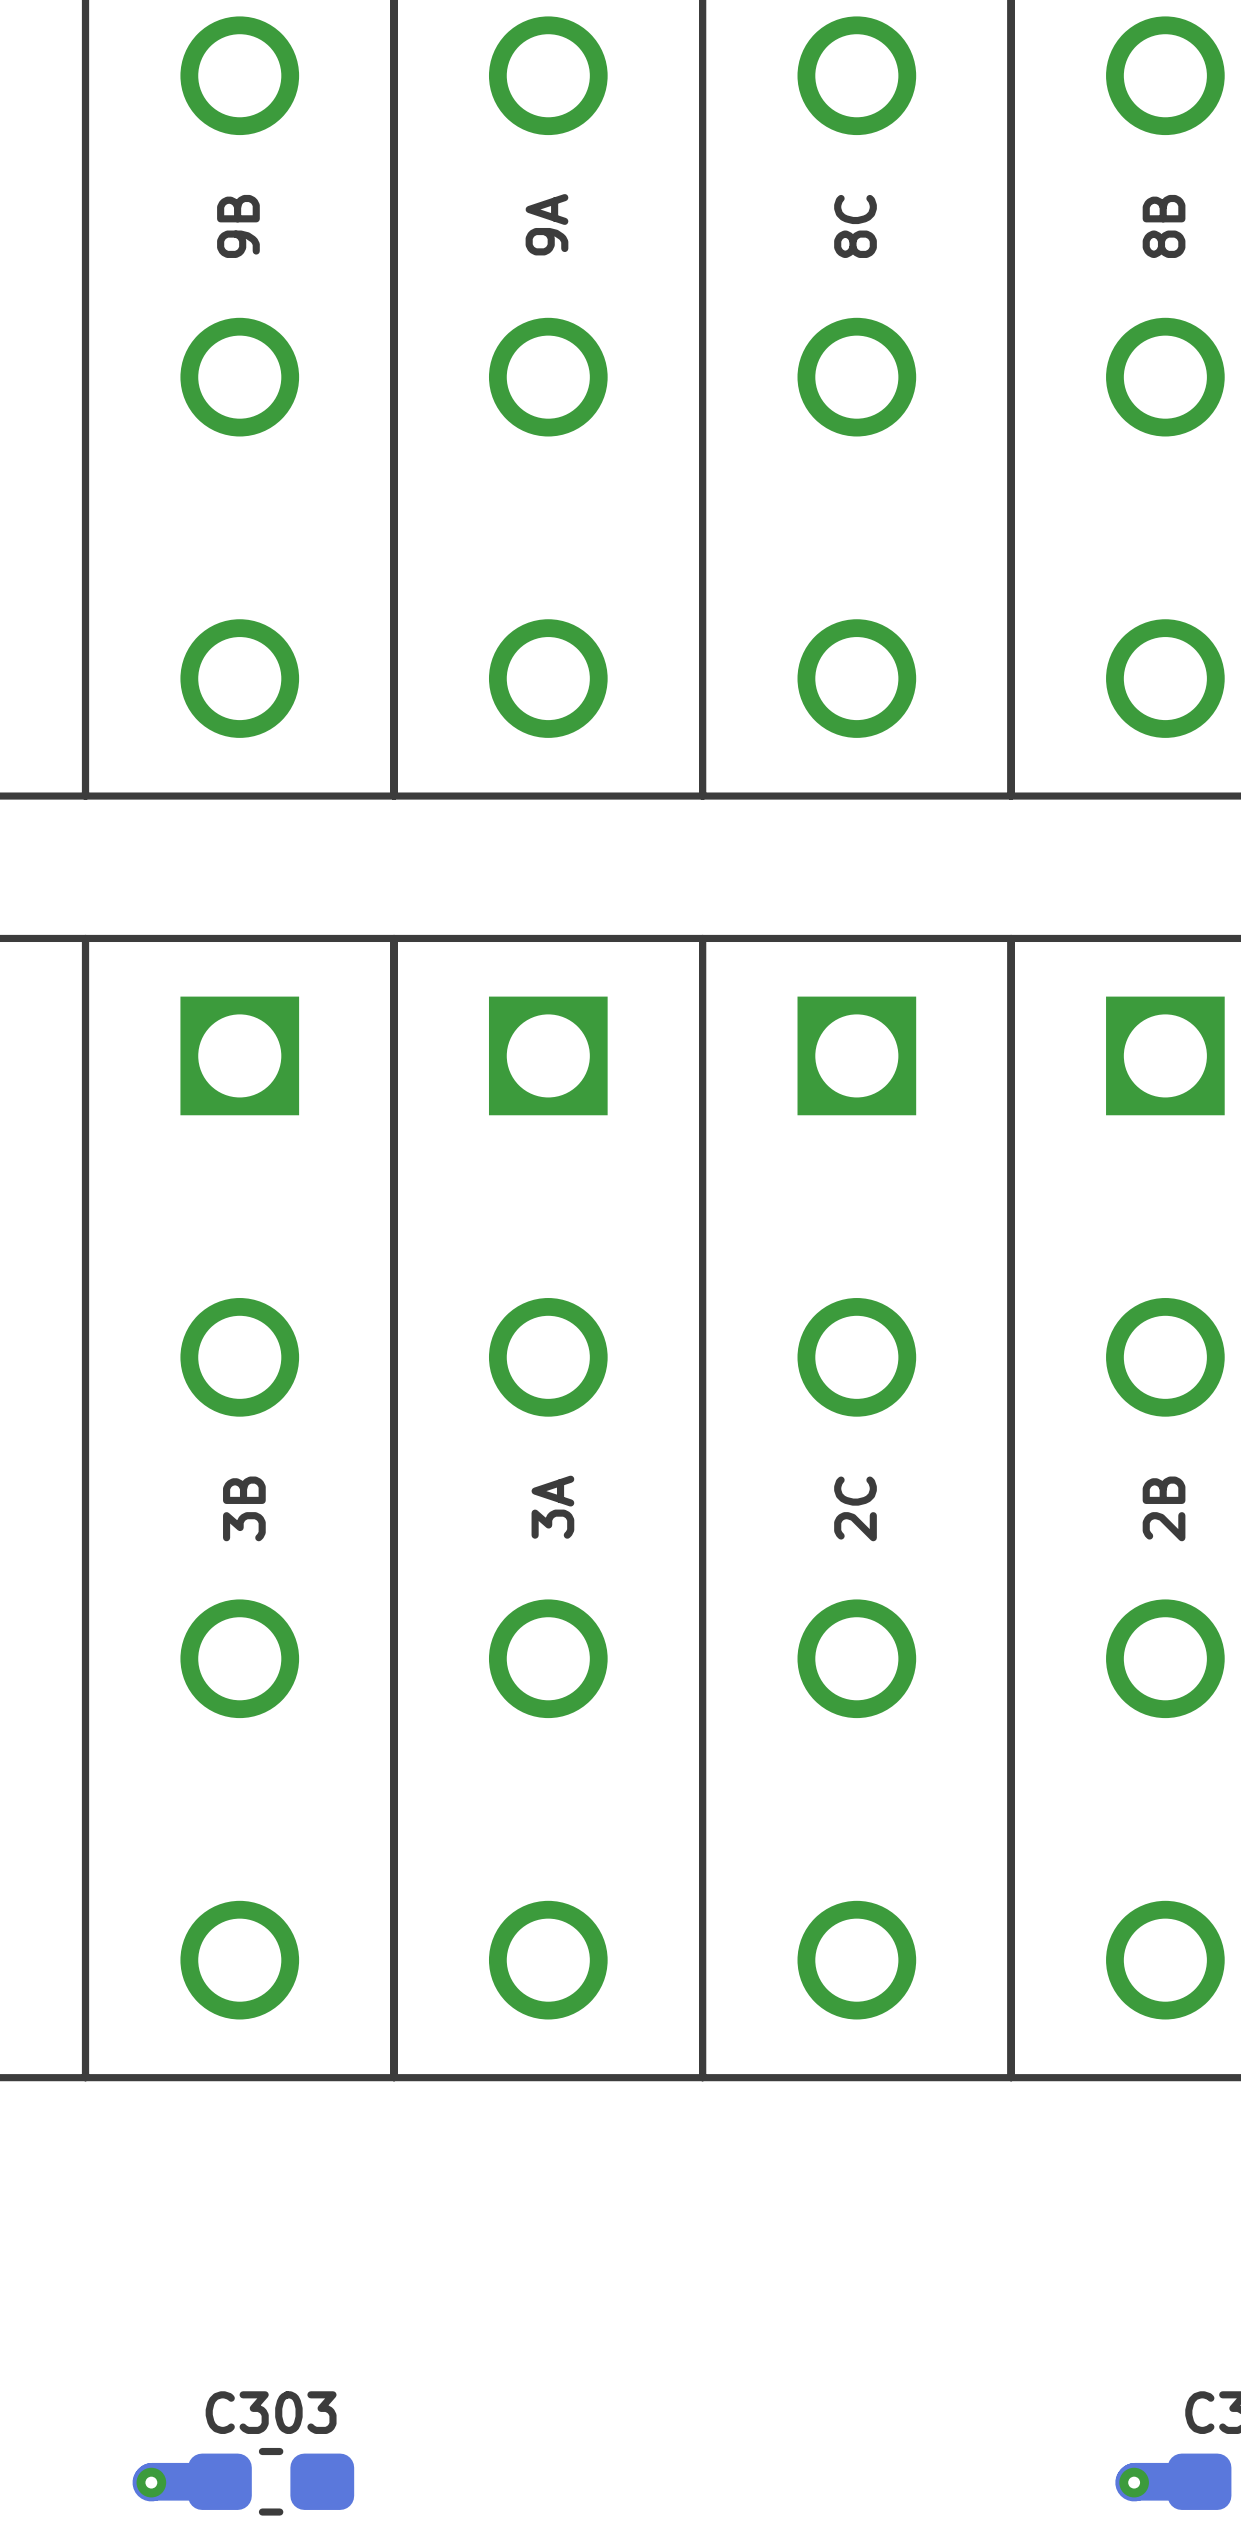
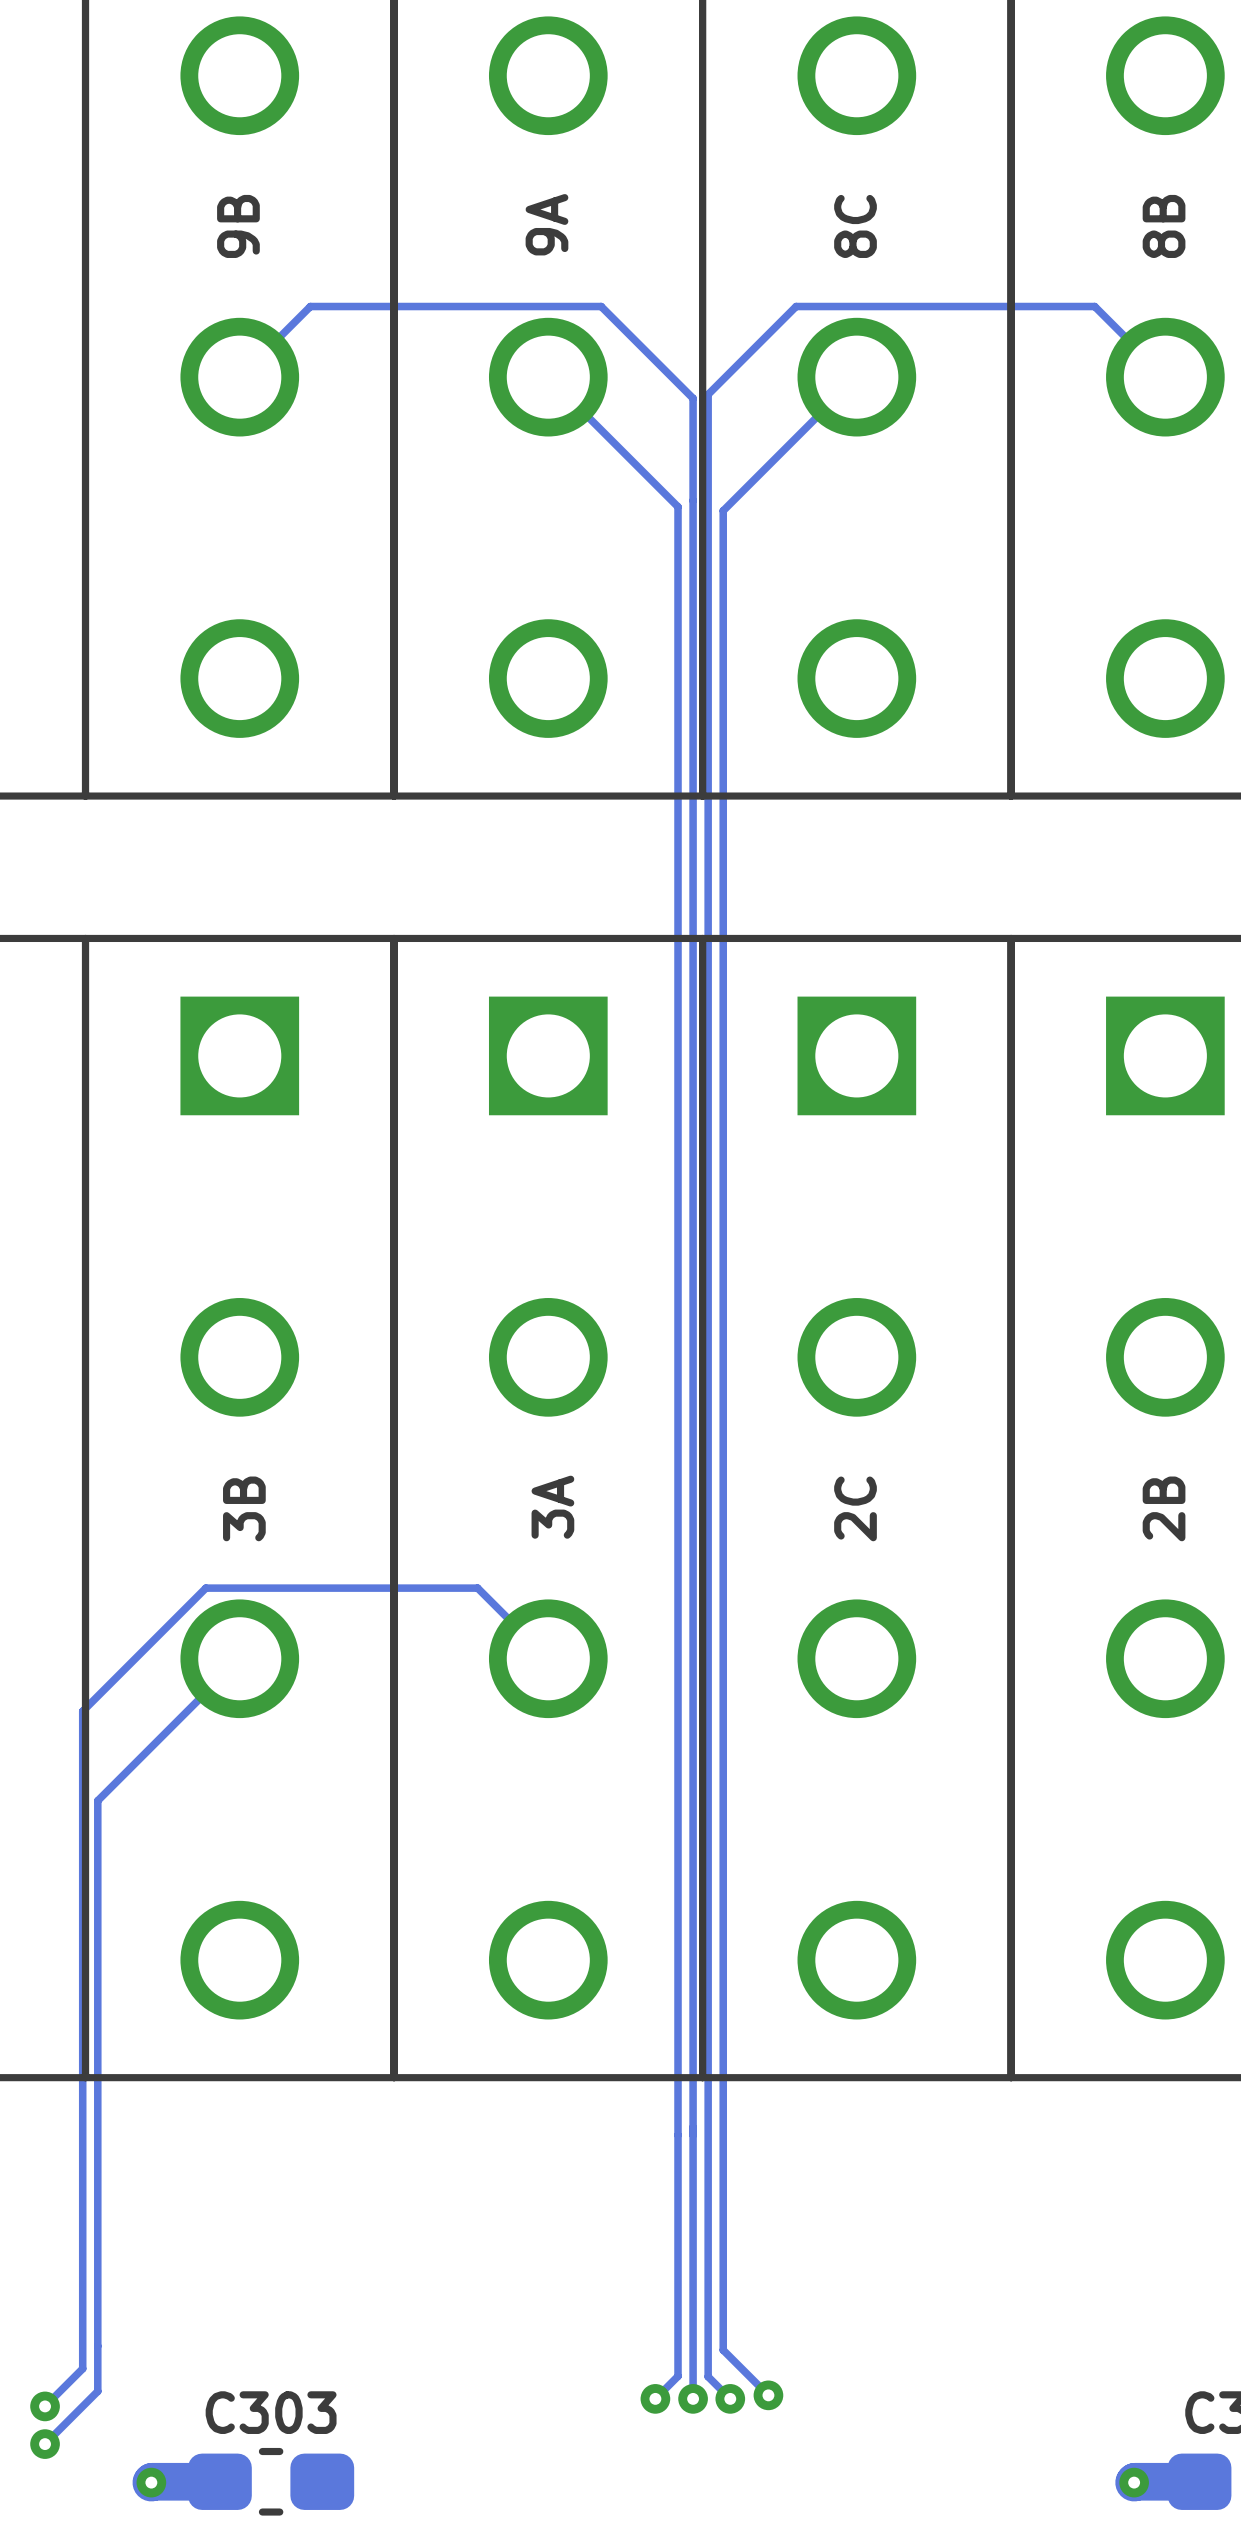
track: none -> (239, 377) (310, 306) (601, 306) (693, 398) (693, 2398)
track: none -> (548, 377) (678, 506) (678, 2376) (655, 2398)
track: none -> (856, 377) (723, 510) (723, 2350) (768, 2395)
track: none -> (1165, 377) (1094, 306) (796, 306) (708, 394) (708, 2376) (730, 2398)
track: none -> (239, 1658) (97, 1800) (97, 2391) (45, 2444)
track: none -> (548, 1658) (477, 1588) (205, 1588) (82, 1711) (82, 2368) (45, 2406)
via: none -> (768, 2395)
via: none -> (655, 2398)
via: none -> (693, 2398)
via: none -> (730, 2398)
via: none -> (45, 2406)
via: none -> (45, 2444)

